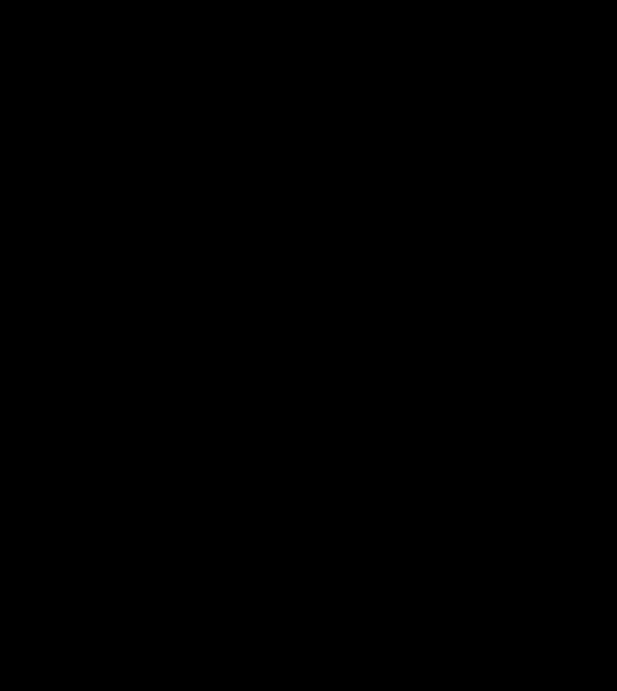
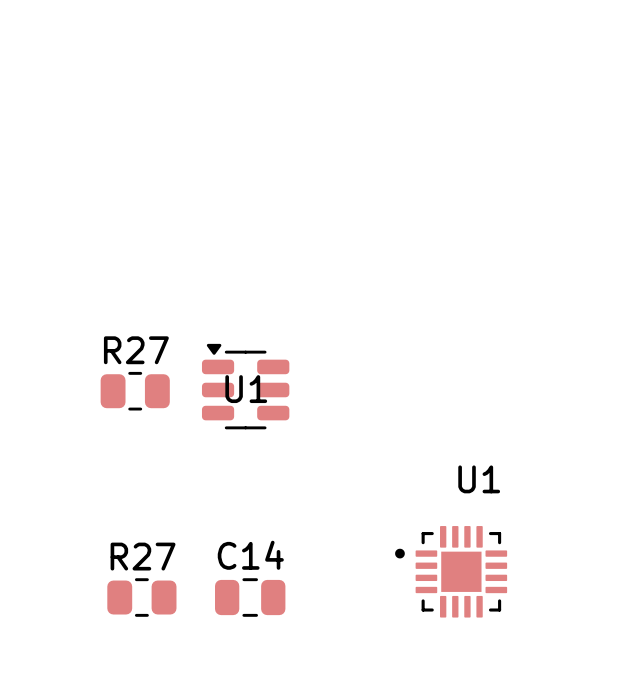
U1: none -> (245, 386)
R27: none -> (135, 391)
U1: none -> (451, 571)
R27: none -> (141, 597)
C14: none -> (250, 597)

